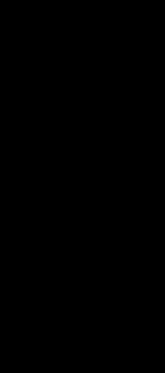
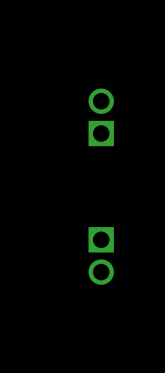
part: none -> (101, 117)
part: none -> (101, 255)

